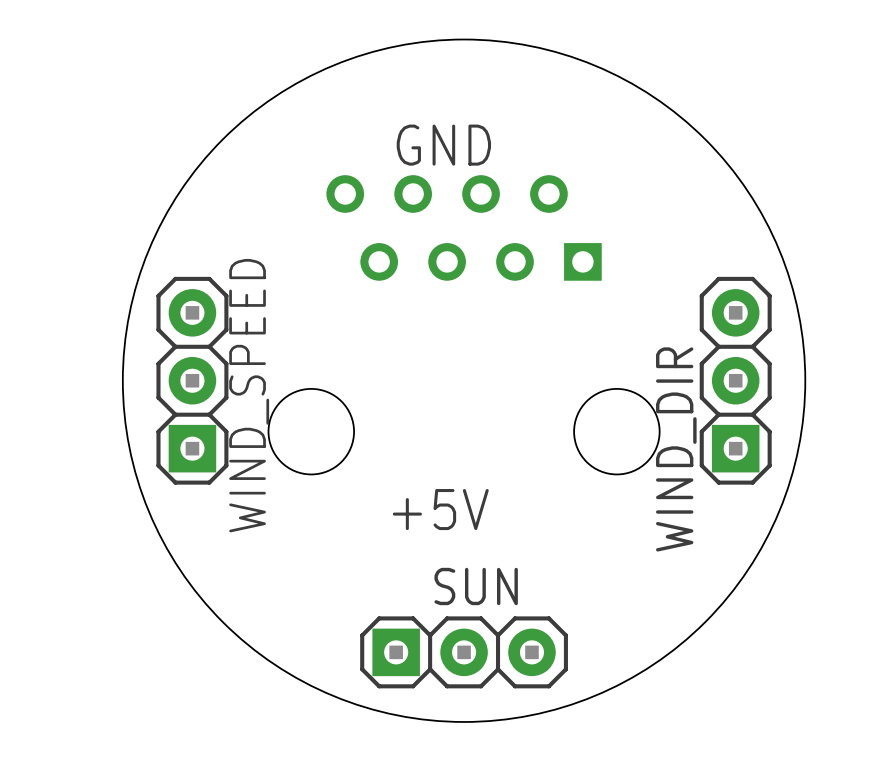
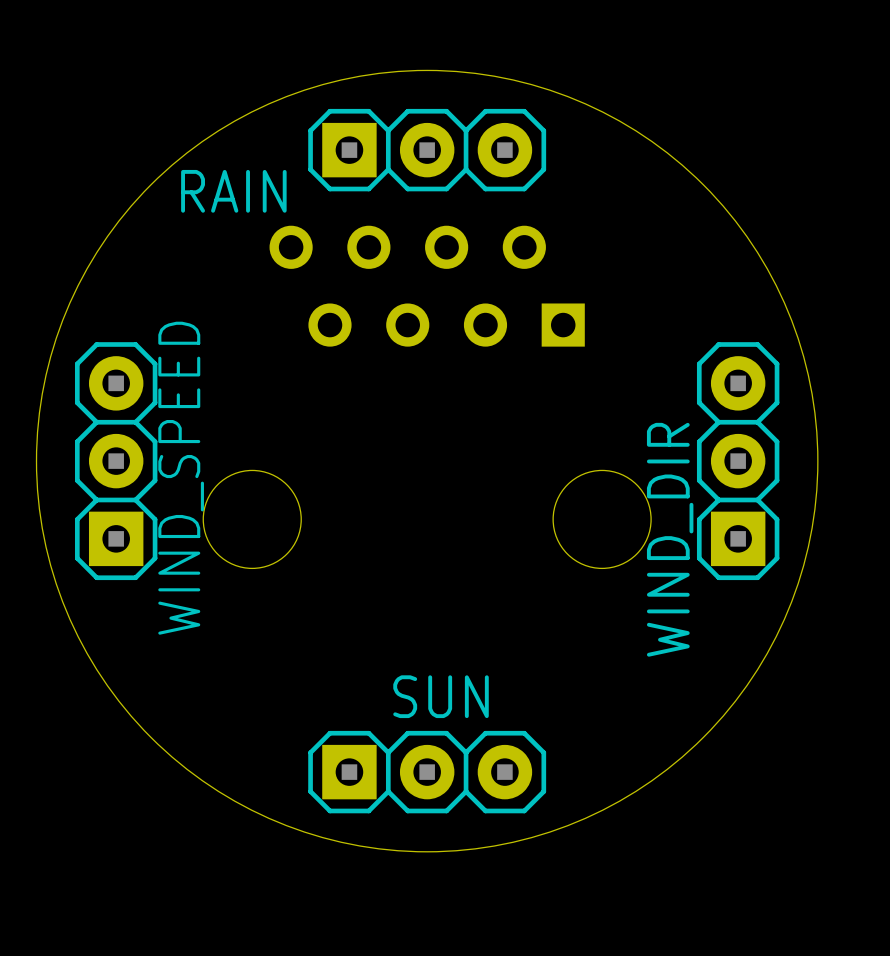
RAIN: none -> (427, 150)
text: GND (443, 145) -> none
text: +5V (440, 509) -> none

